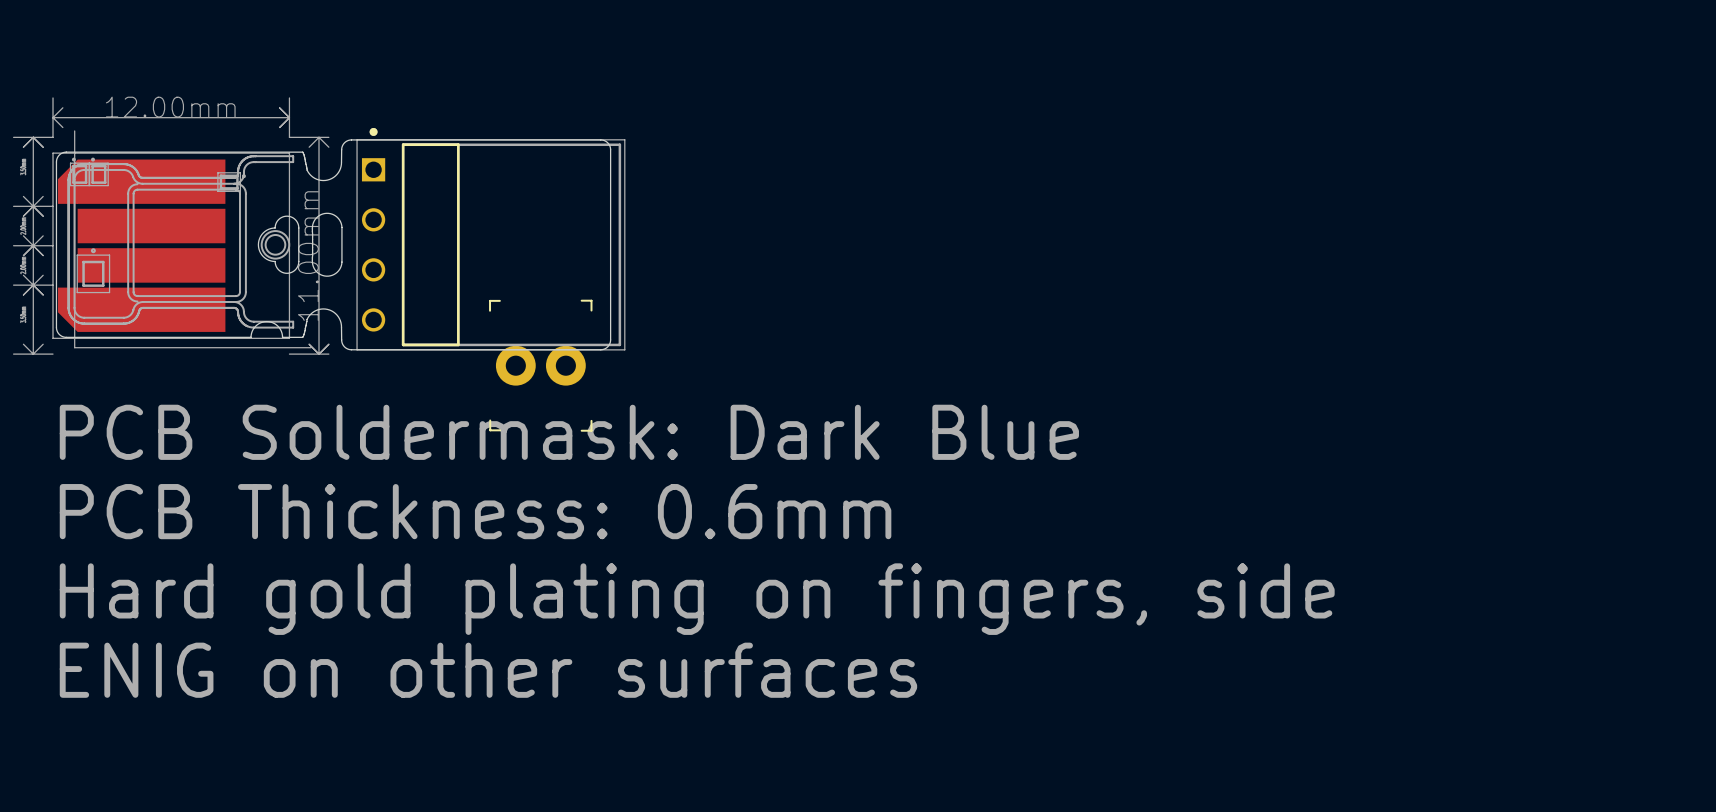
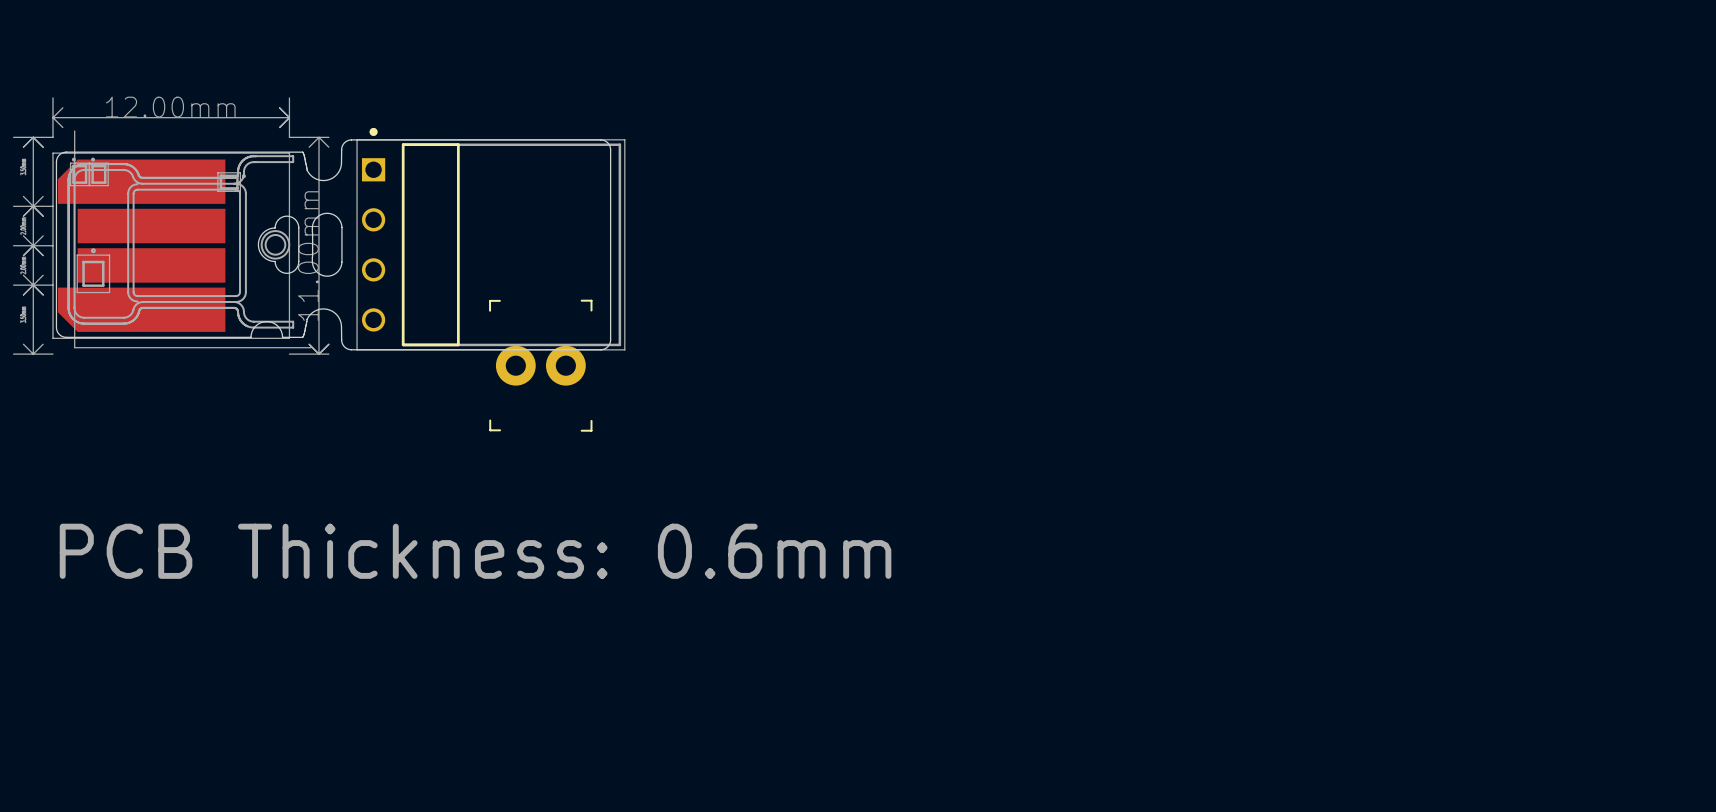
text: PCB Soldermask: Dark Blue (569, 432) -> none
text position: PCB Thickness: 0.6mm (475, 511) -> PCB Thickness: 0.6mm (475, 551)
text: Hard gold plating on fingers, side (697, 599) -> none
text: ENIG on other surfaces (488, 670) -> none

